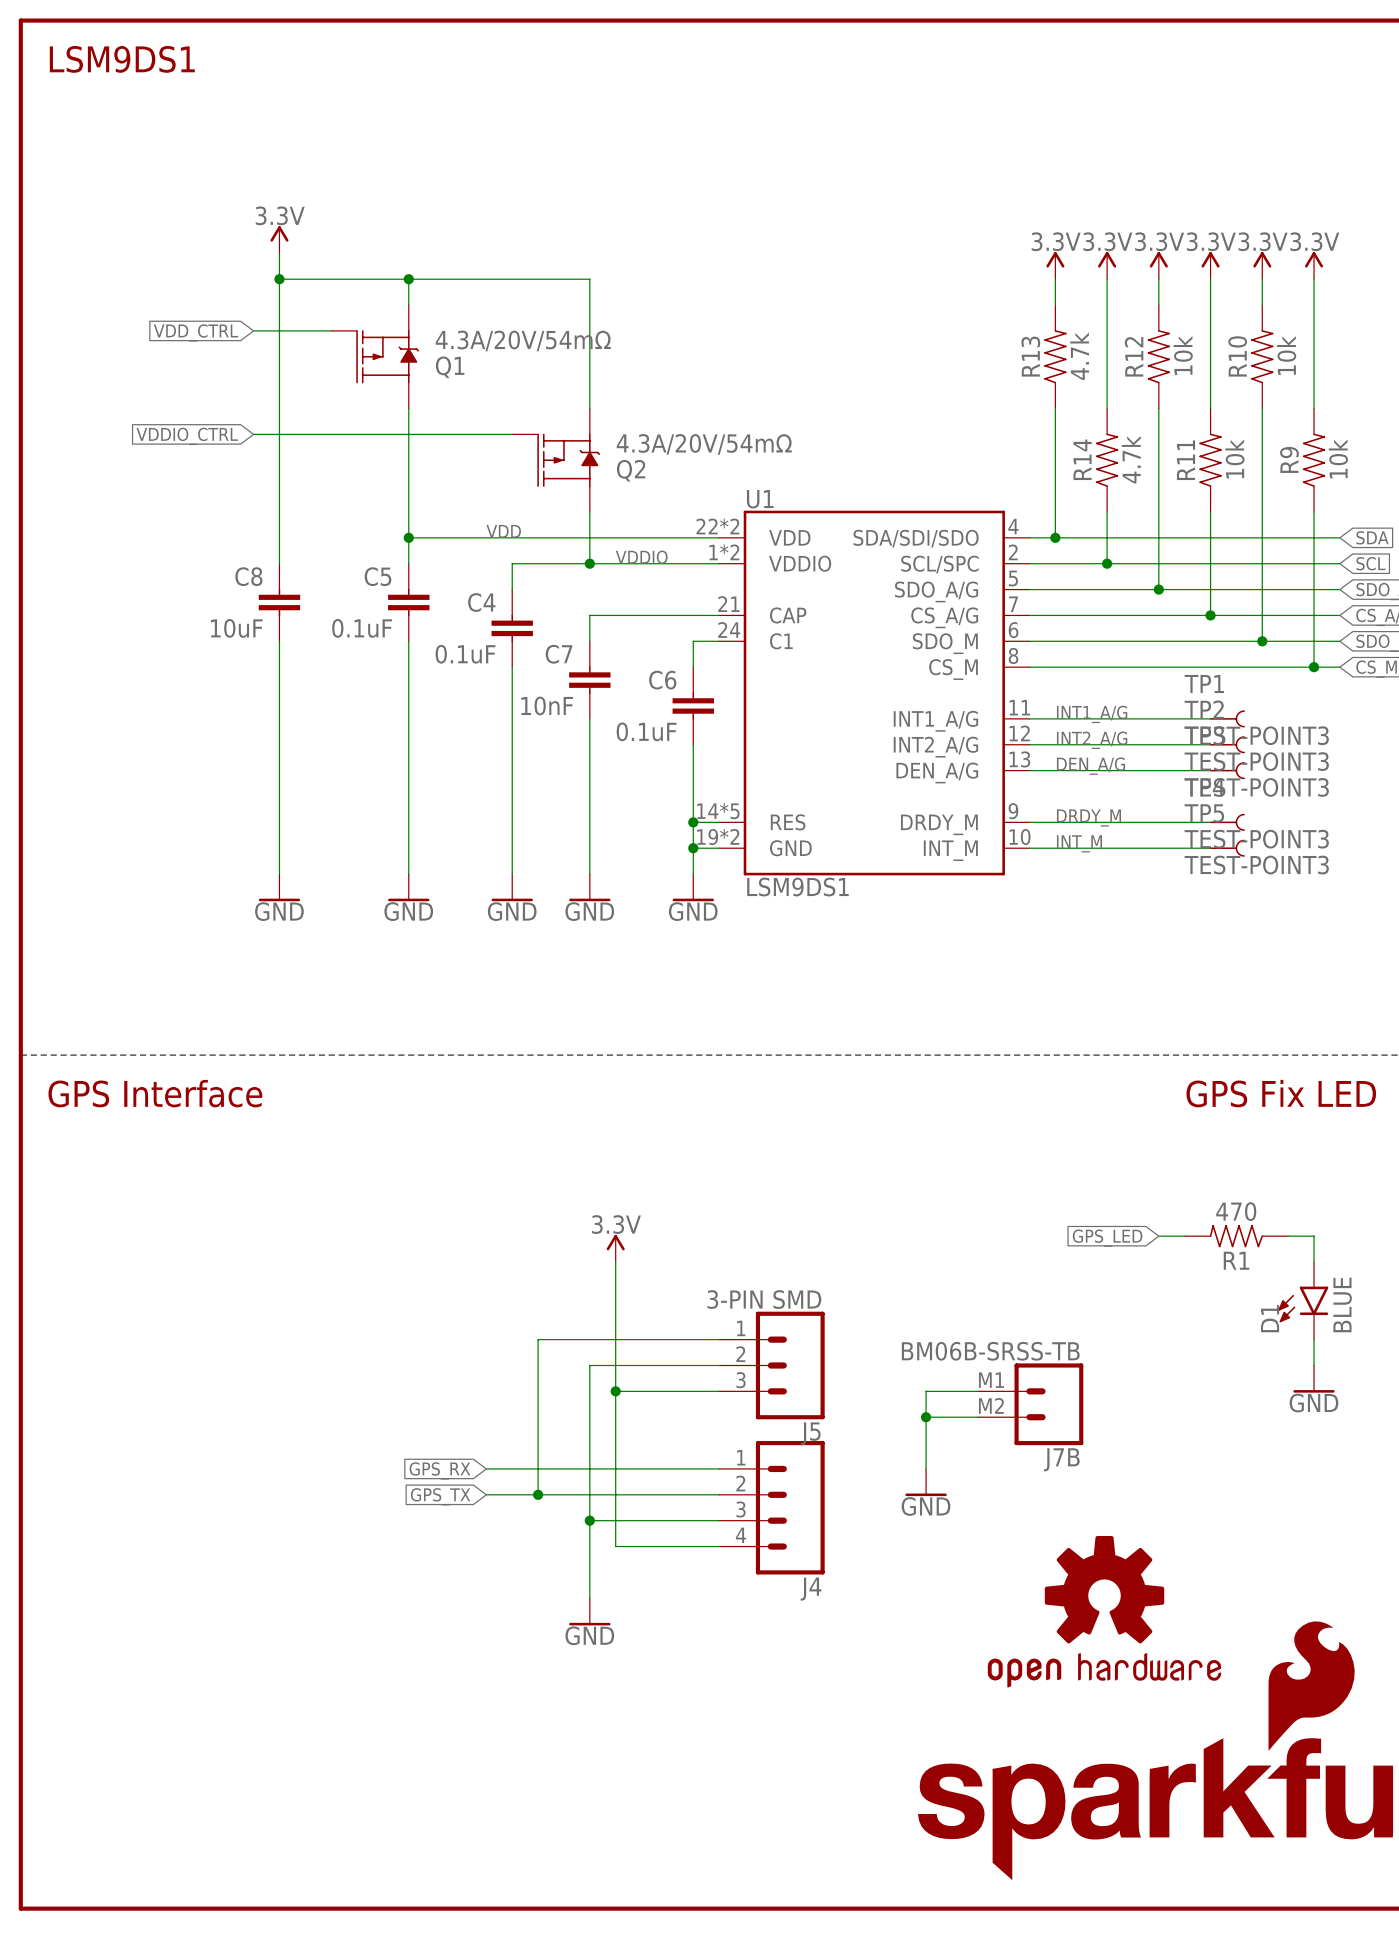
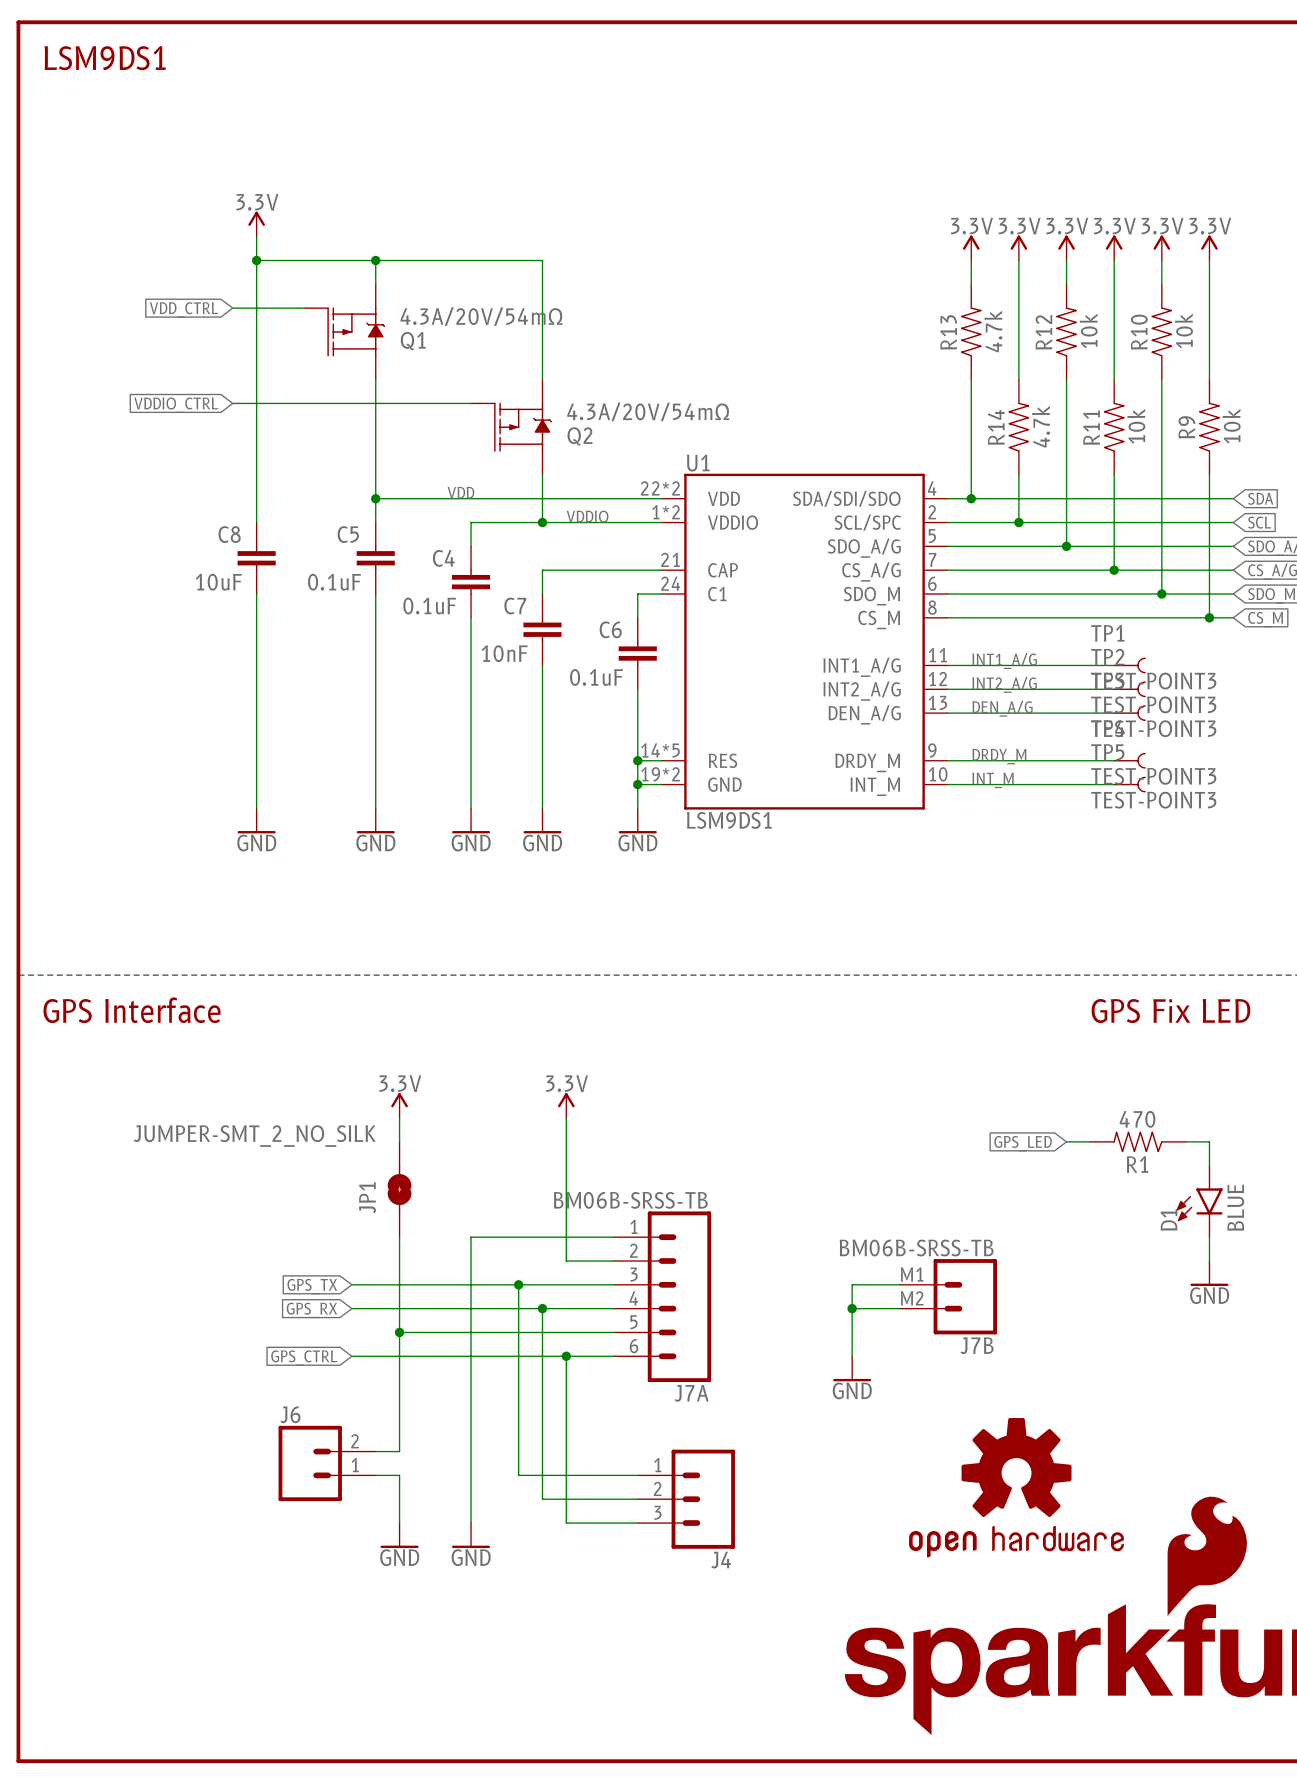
power symbol: none -> 3.3V (399, 1105)
wire: none -> (399, 1118) (399, 1141)
power symbol position: 3.3V (615, 1248) -> 3.3V (566, 1105)
JP1: none -> JUMPER-SMT_2_NO_SILK (399, 1189)
wire: none -> (399, 1237) (399, 1451) (375, 1451)
wire: (538, 1339) (538, 1494) -> (494, 1237) (471, 1237) (471, 1523)
J5: 3-PIN SMD (771, 1365) -> none
wire: none -> (351, 1284) (566, 1284)
wire: none -> (518, 1284) (518, 1475) (637, 1475)
junction: none -> (518, 1284)
junction: (615, 1391) -> none
J7A: none -> BM06B-SRSS-TB (662, 1296)
wire: none -> (351, 1308) (613, 1308)
wire: (589, 1417) (589, 1365) (615, 1365) (615, 1468) -> none
junction: none -> (542, 1308)
J4 symbol: [719, 1441, 825, 1575] -> [637, 1449, 735, 1549]
junction: none -> (399, 1332)
wire: none -> (351, 1356) (447, 1356)
junction: none -> (566, 1356)
global label: none -> GPS_CTRL (304, 1358)
global label position: GPS_RX (439, 1470) -> GPS_RX (311, 1310)
wire: (486, 1494) (719, 1494) -> (399, 1332) (613, 1332)
junction: (538, 1494) -> none
global label position: GPS_TX (440, 1496) -> GPS_TX (312, 1286)
wire: (589, 1520) (719, 1520) -> none
junction: (589, 1520) -> none
wire: (615, 1546) (719, 1546) -> (566, 1427) (566, 1523) (637, 1523)
J6: none -> (327, 1463)
wire: none -> (375, 1475) (399, 1475) (399, 1523)
wire: none -> (542, 1475) (542, 1499) (637, 1499)
power symbol: GND (589, 1611) -> none
power symbol: none -> GND (399, 1535)
power symbol: none -> GND (471, 1535)

